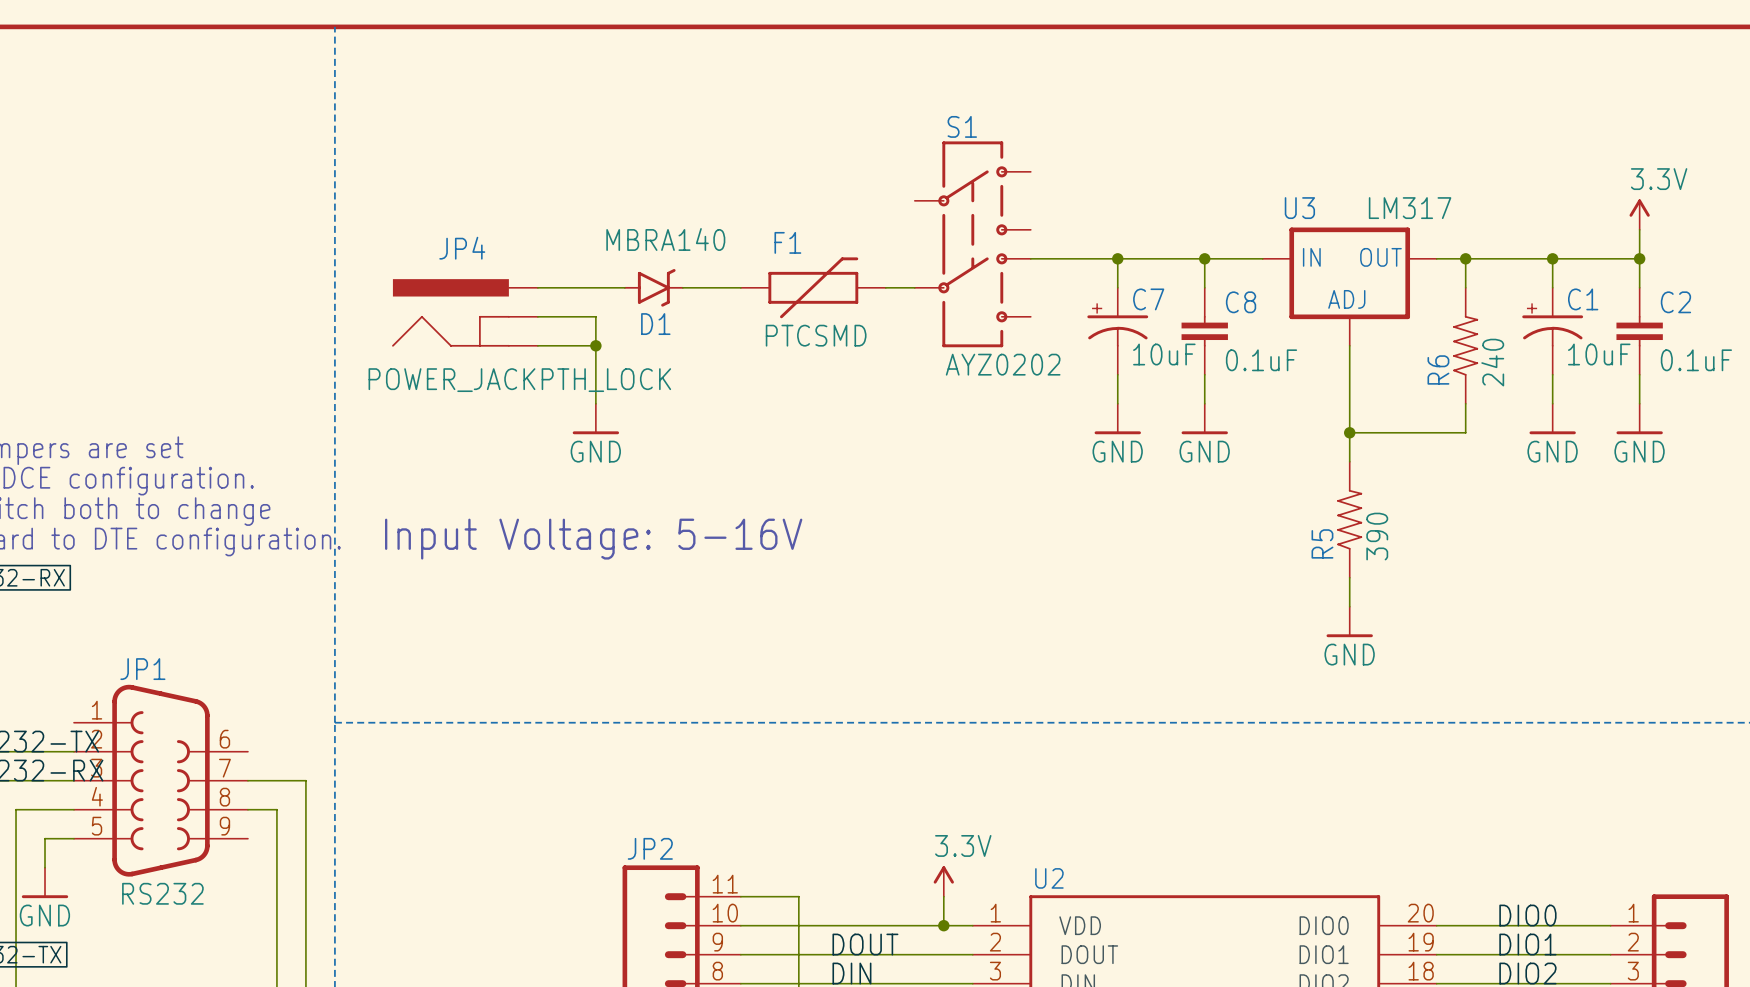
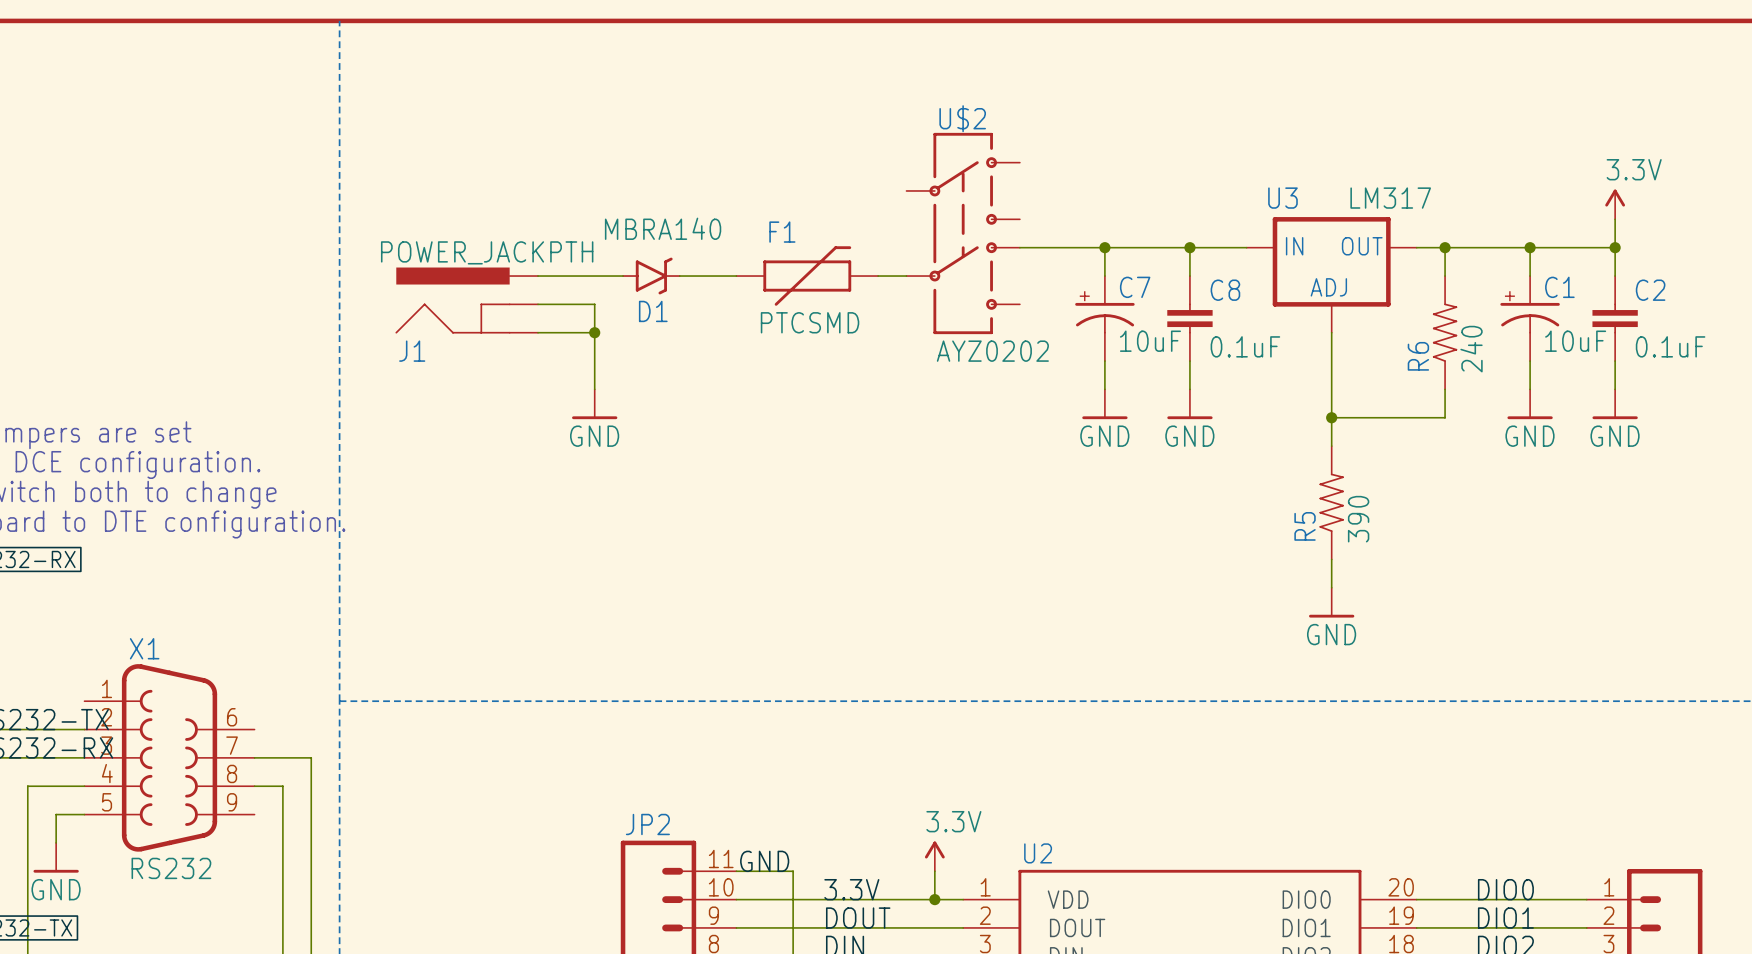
S1 name: S1 (962, 126) -> U$2 (962, 118)
JP4 name: JP4 (462, 248) -> J1 (412, 351)
JP4 value: POWER_JACKPTH_LOCK (519, 380) -> POWER_JACKPTH (487, 252)
text: Input Voltage: 5-16V (593, 539) -> none
JP1 name: JP1 (142, 669) -> X1 (144, 648)
label: none -> GND (764, 861)
label: none -> 3.3V (851, 889)

